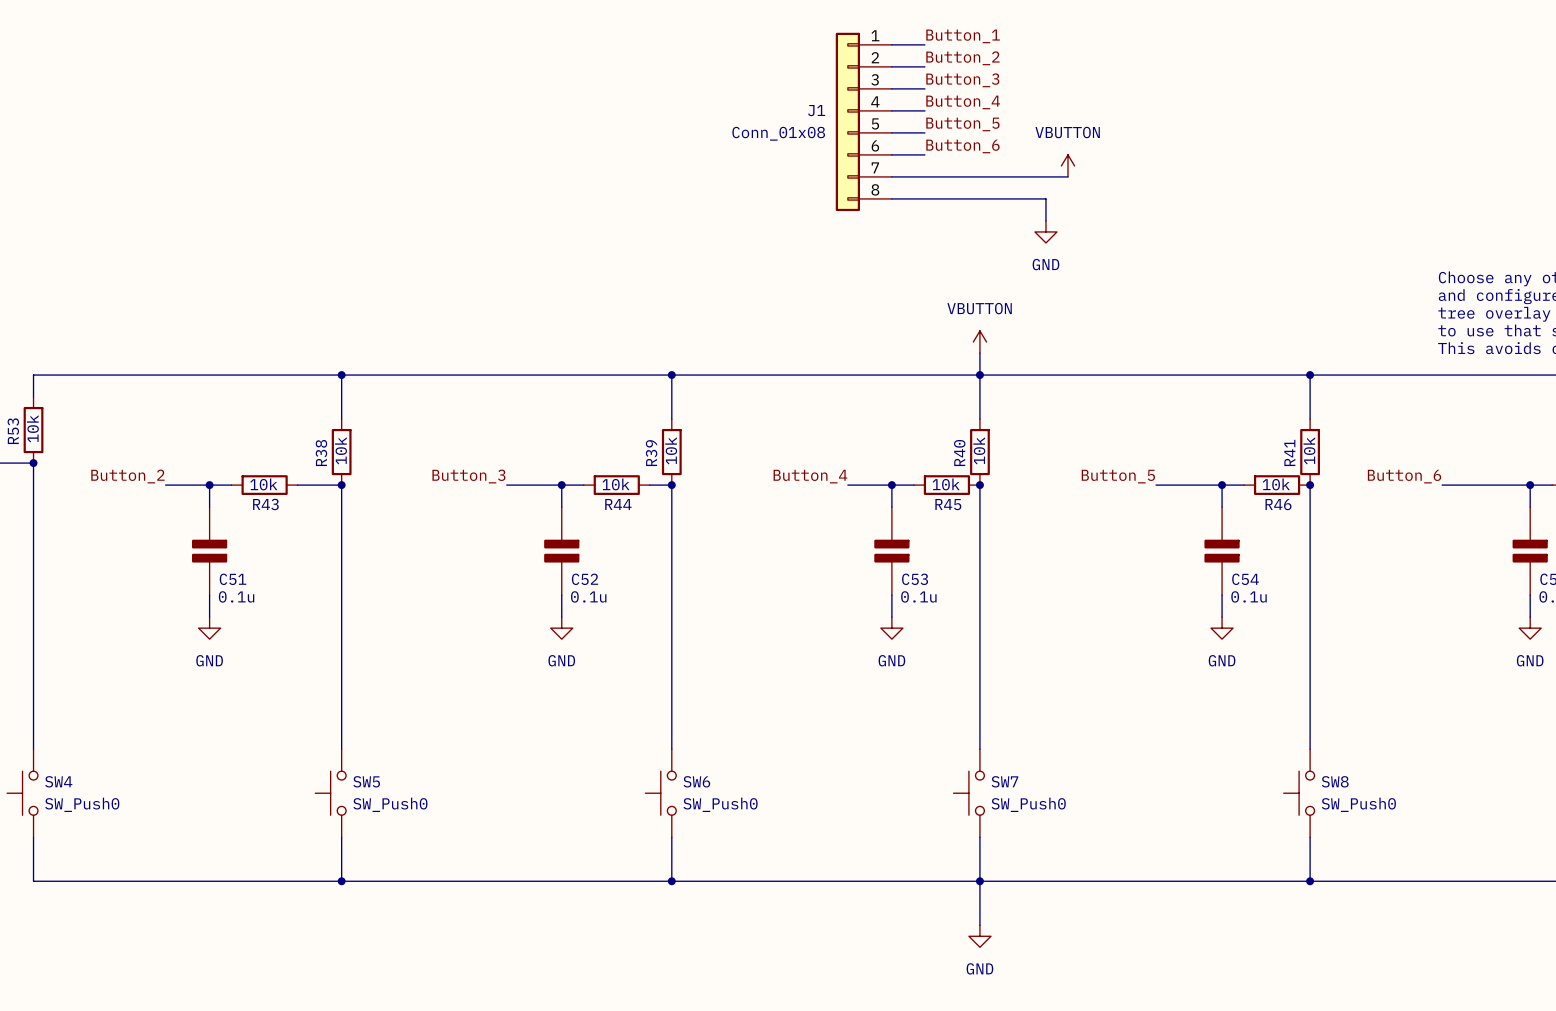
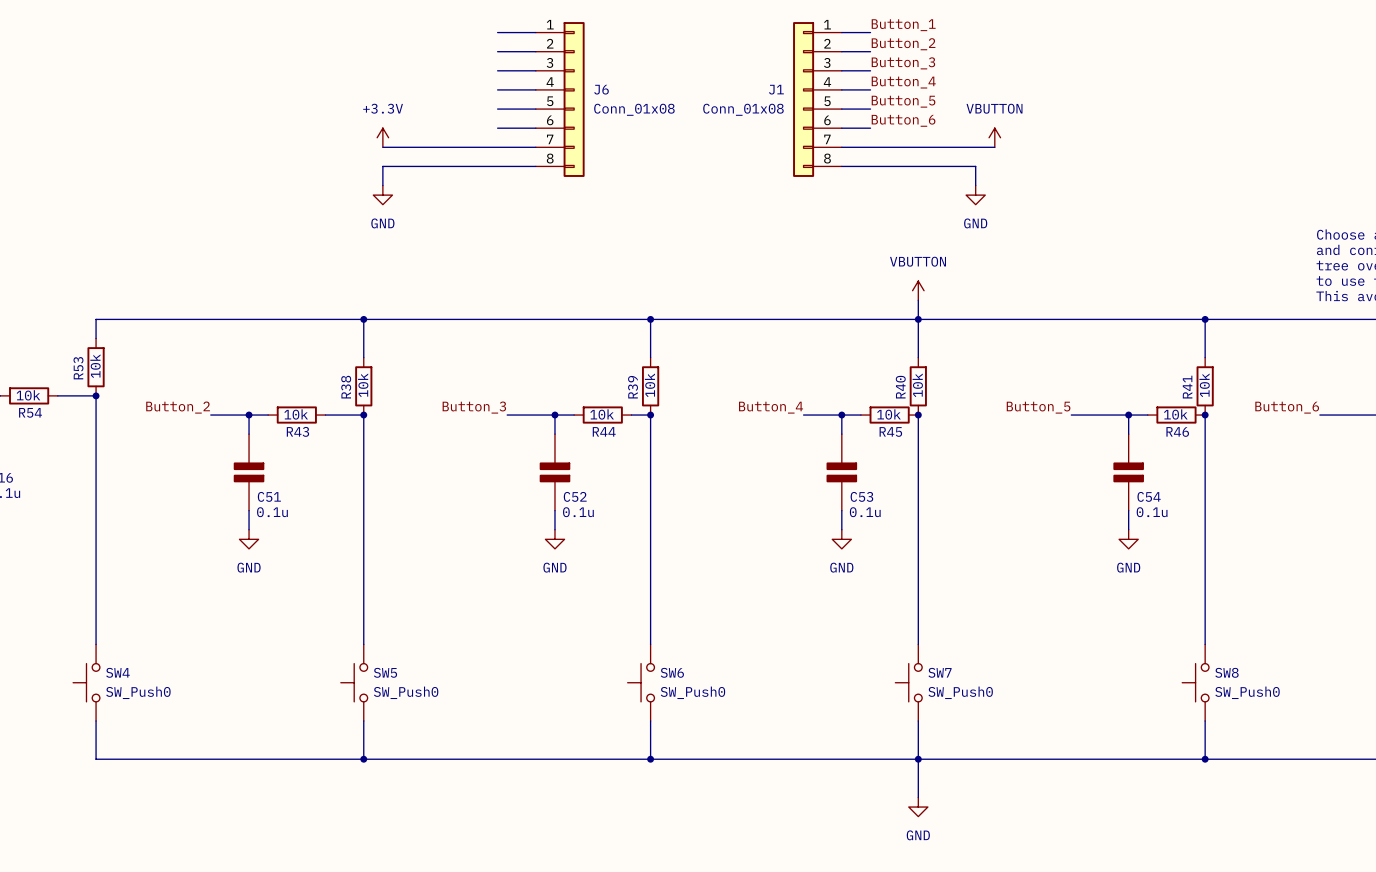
wire: none -> (497, 32) (535, 32)
wire: none -> (497, 51) (535, 51)
wire: none -> (497, 70) (535, 70)
wire: none -> (497, 89) (535, 89)
J6: none -> Conn_01x08 (560, 99)
wire: none -> (497, 109) (535, 109)
wire: none -> (497, 128) (535, 128)
power symbol: none -> +3.3V (382, 137)
wire: none -> (382, 147) (535, 147)
wire: none -> (535, 166) (382, 166) (382, 185)
power symbol: none -> GND (382, 195)

